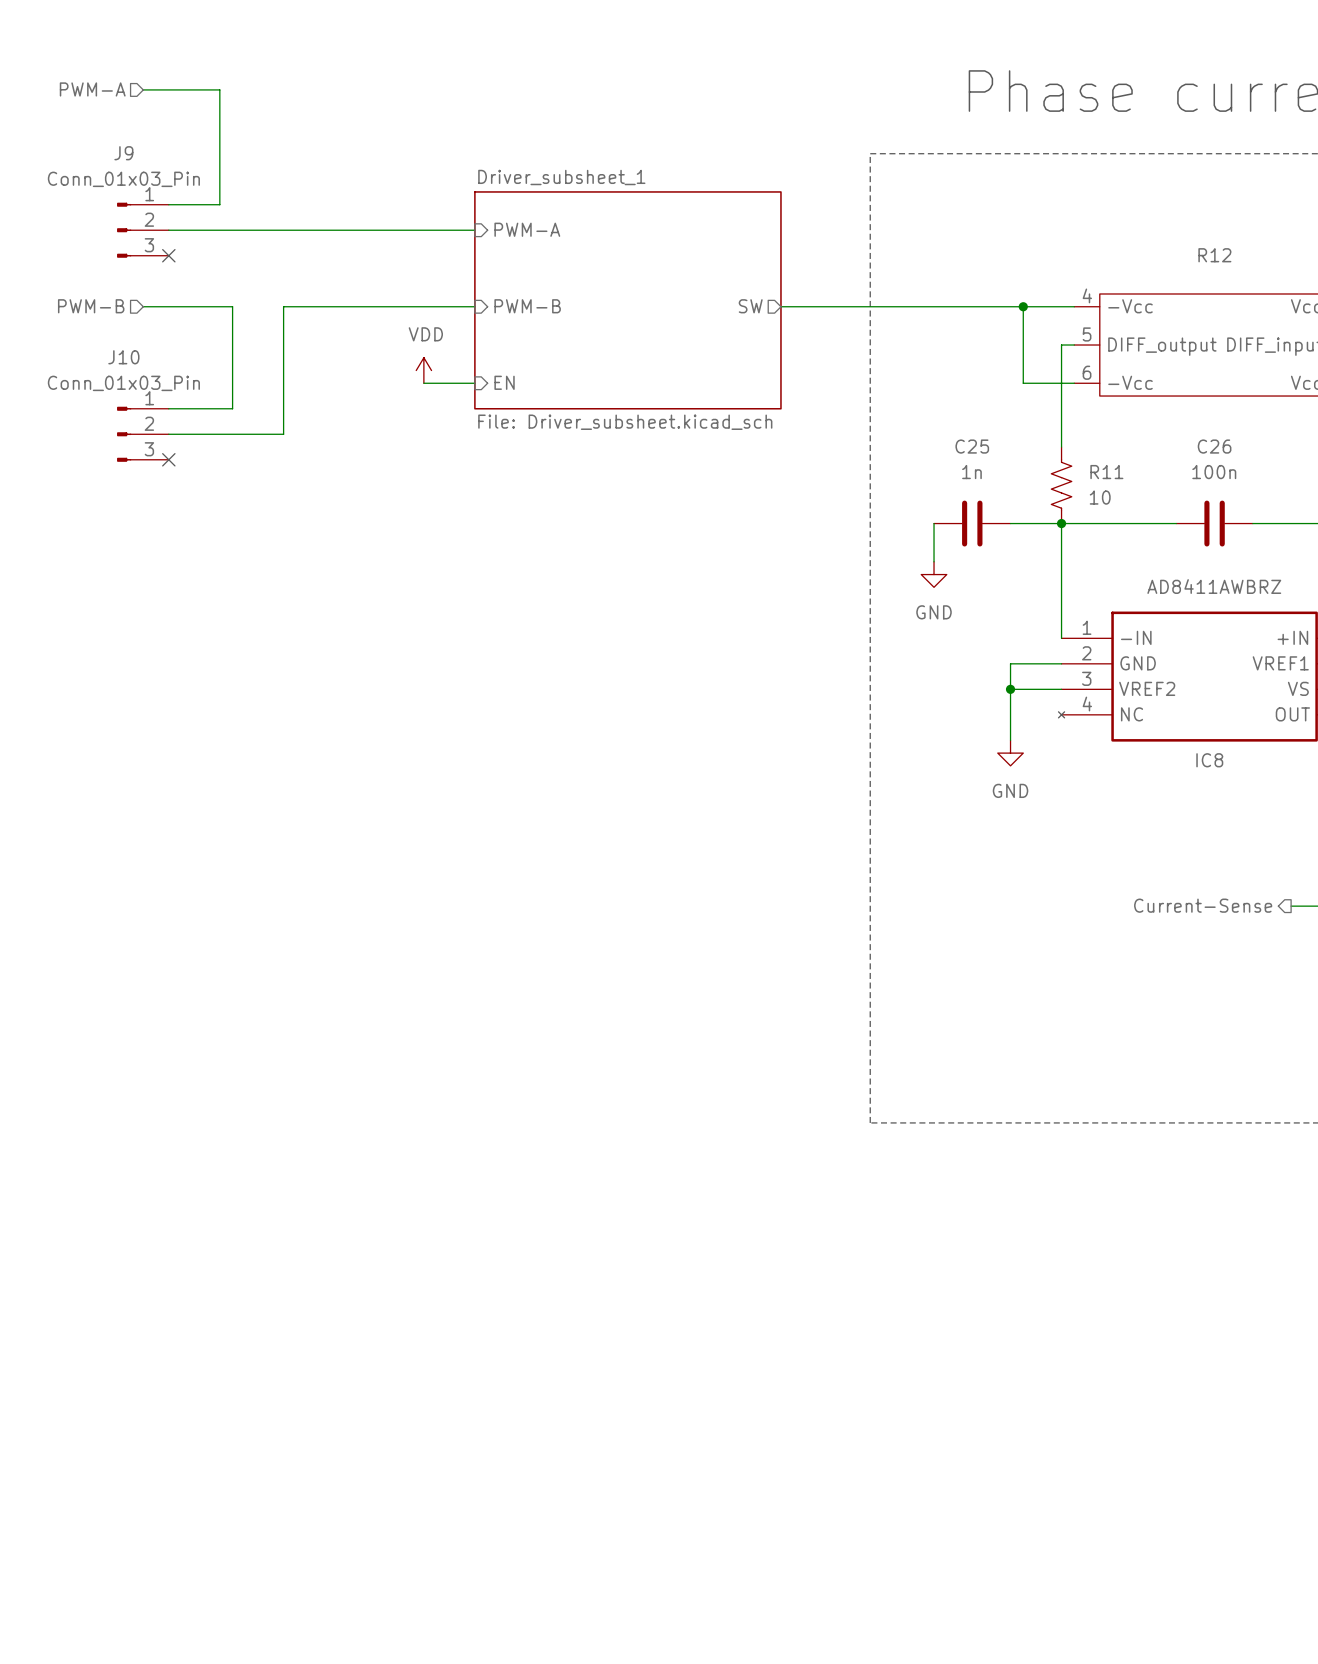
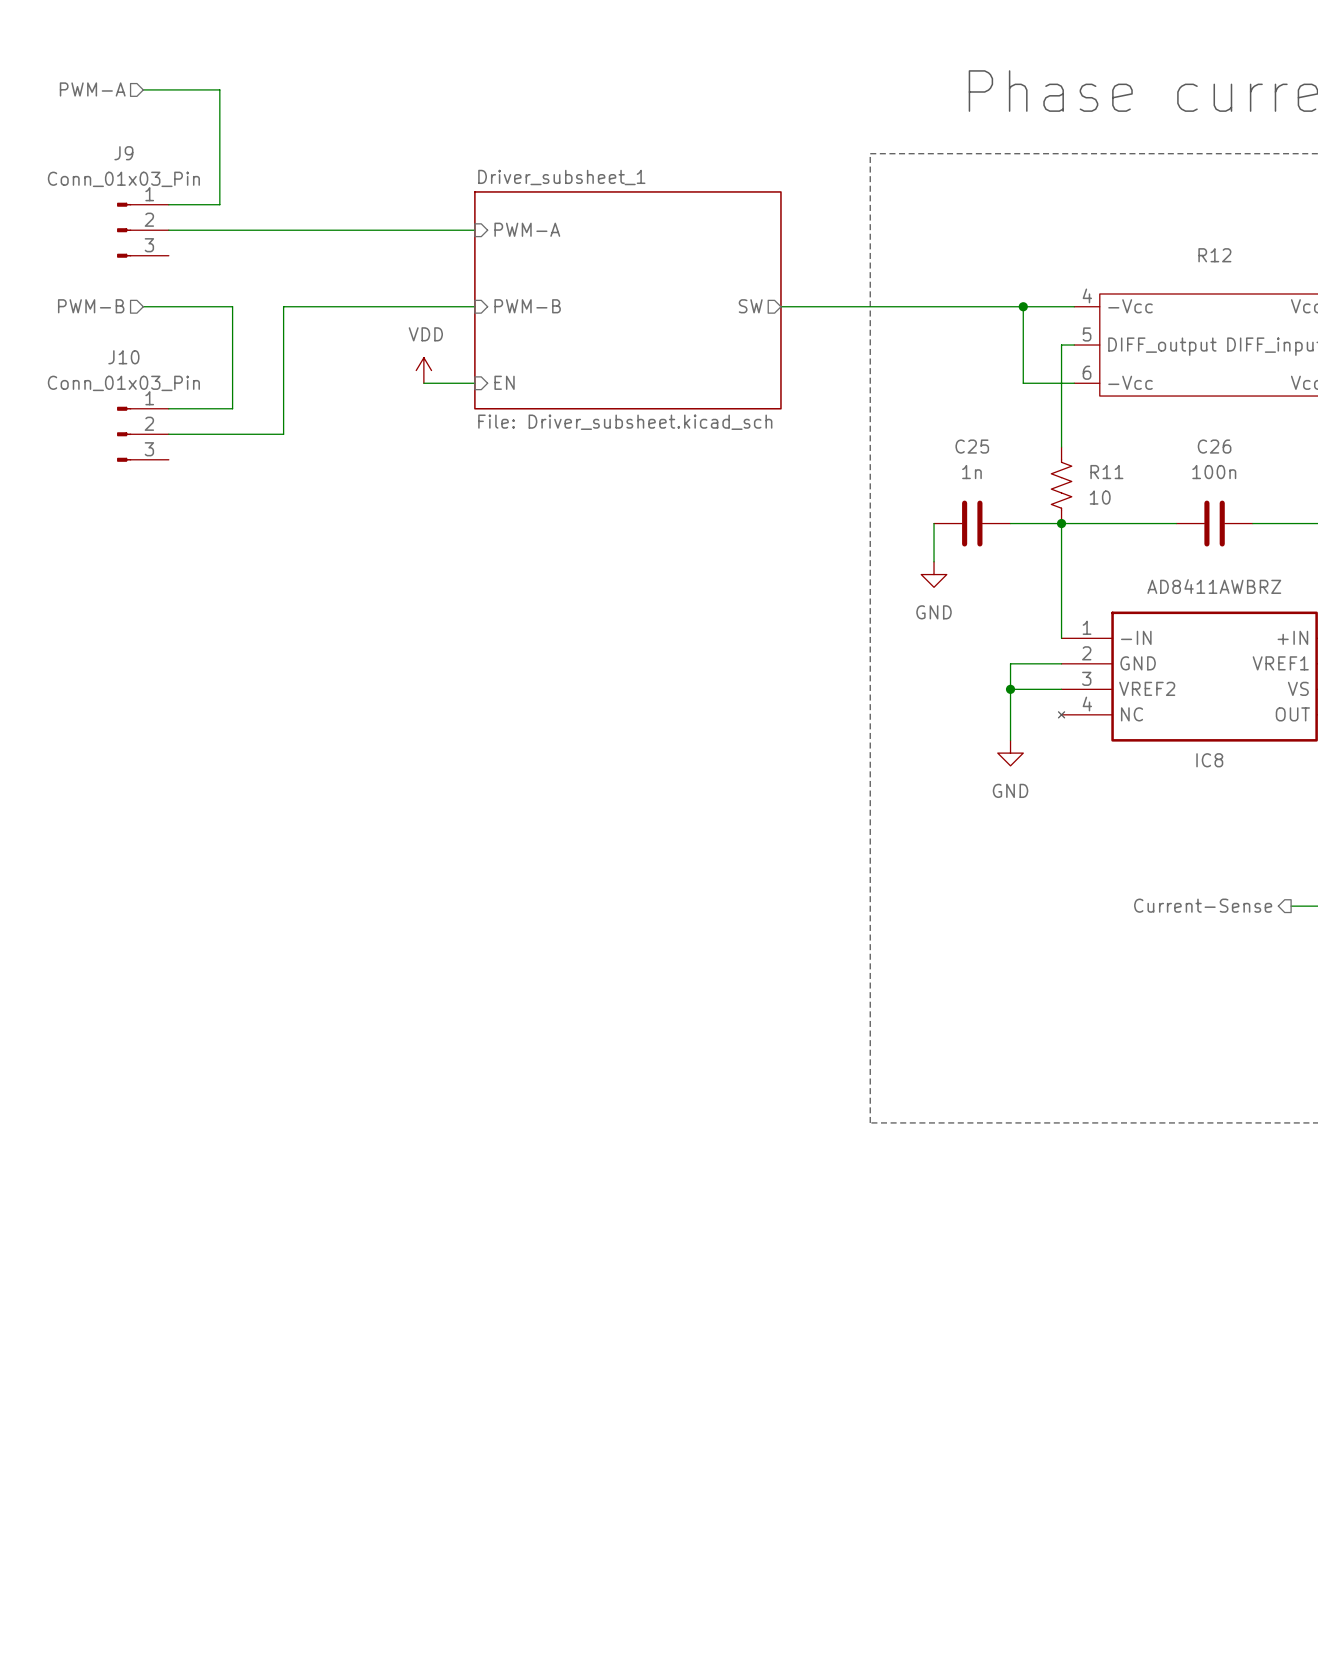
no-connect mark: (168, 255) -> none
no-connect mark: (168, 459) -> none

